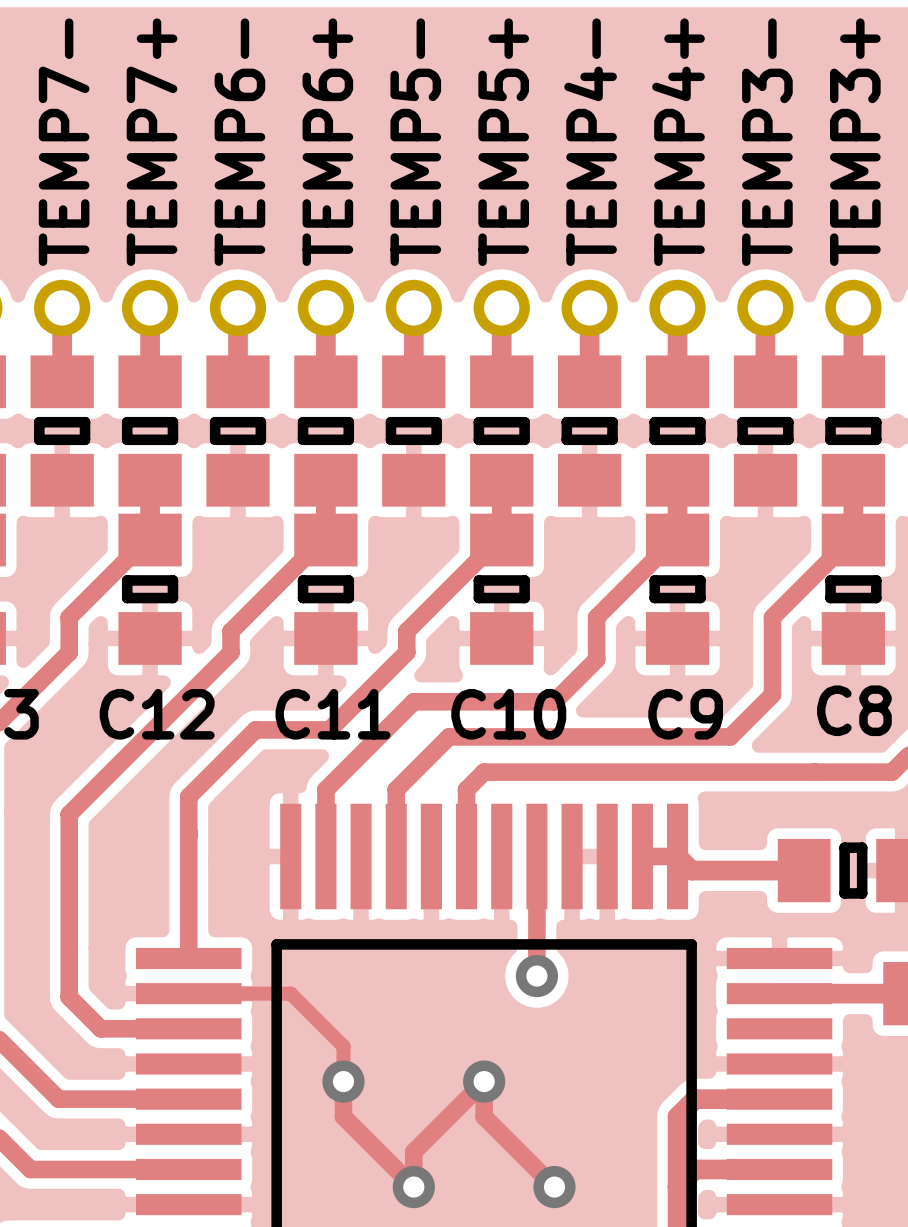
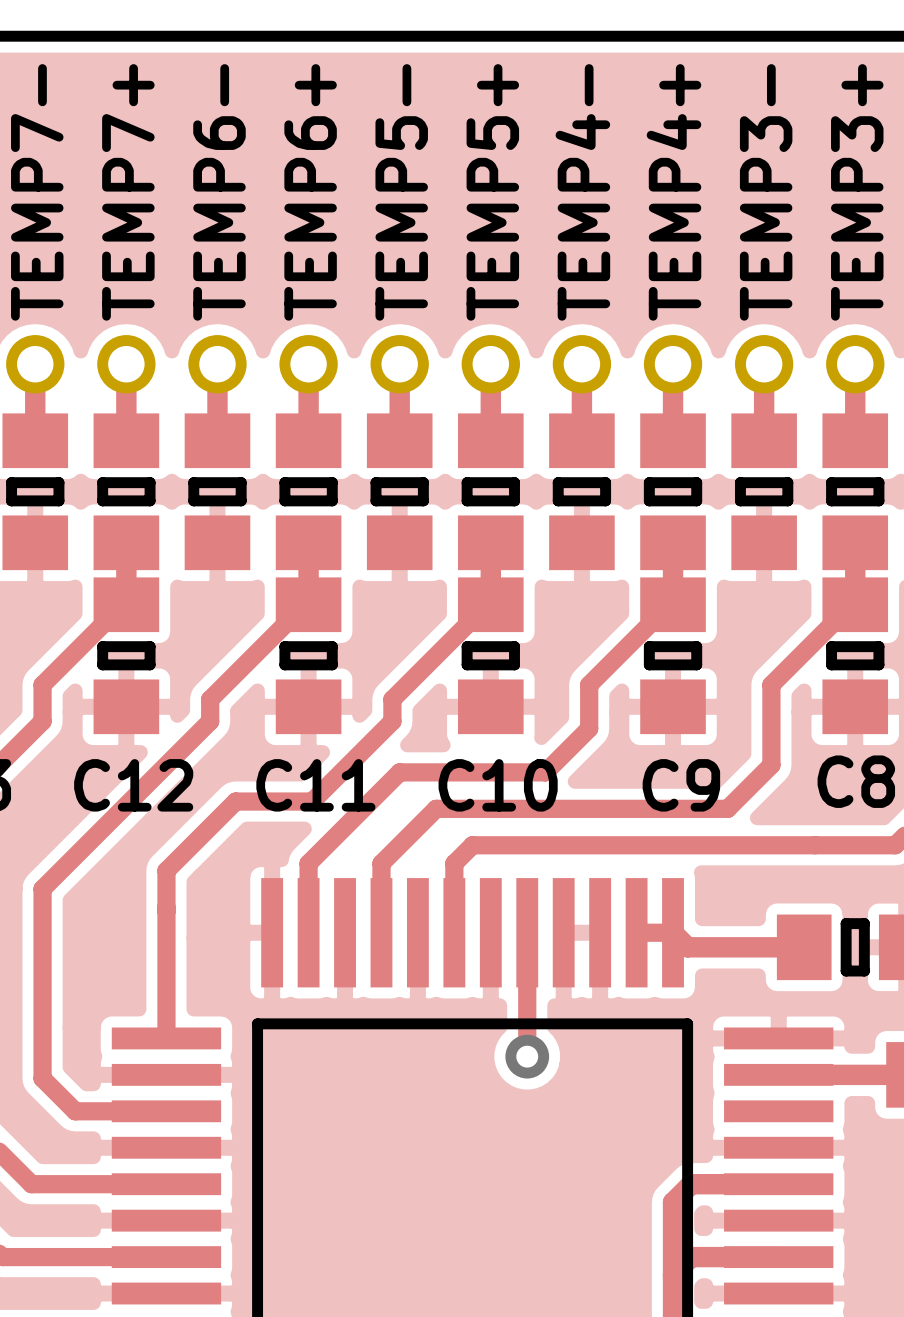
track: (188, 993) (290, 993) (343, 1046) (343, 1116) (413, 1187) (413, 1151) (484, 1081) (484, 1116) (554, 1187) -> none
via: (343, 1081) -> none
via: (484, 1081) -> none
via: (413, 1187) -> none
via: (554, 1187) -> none

